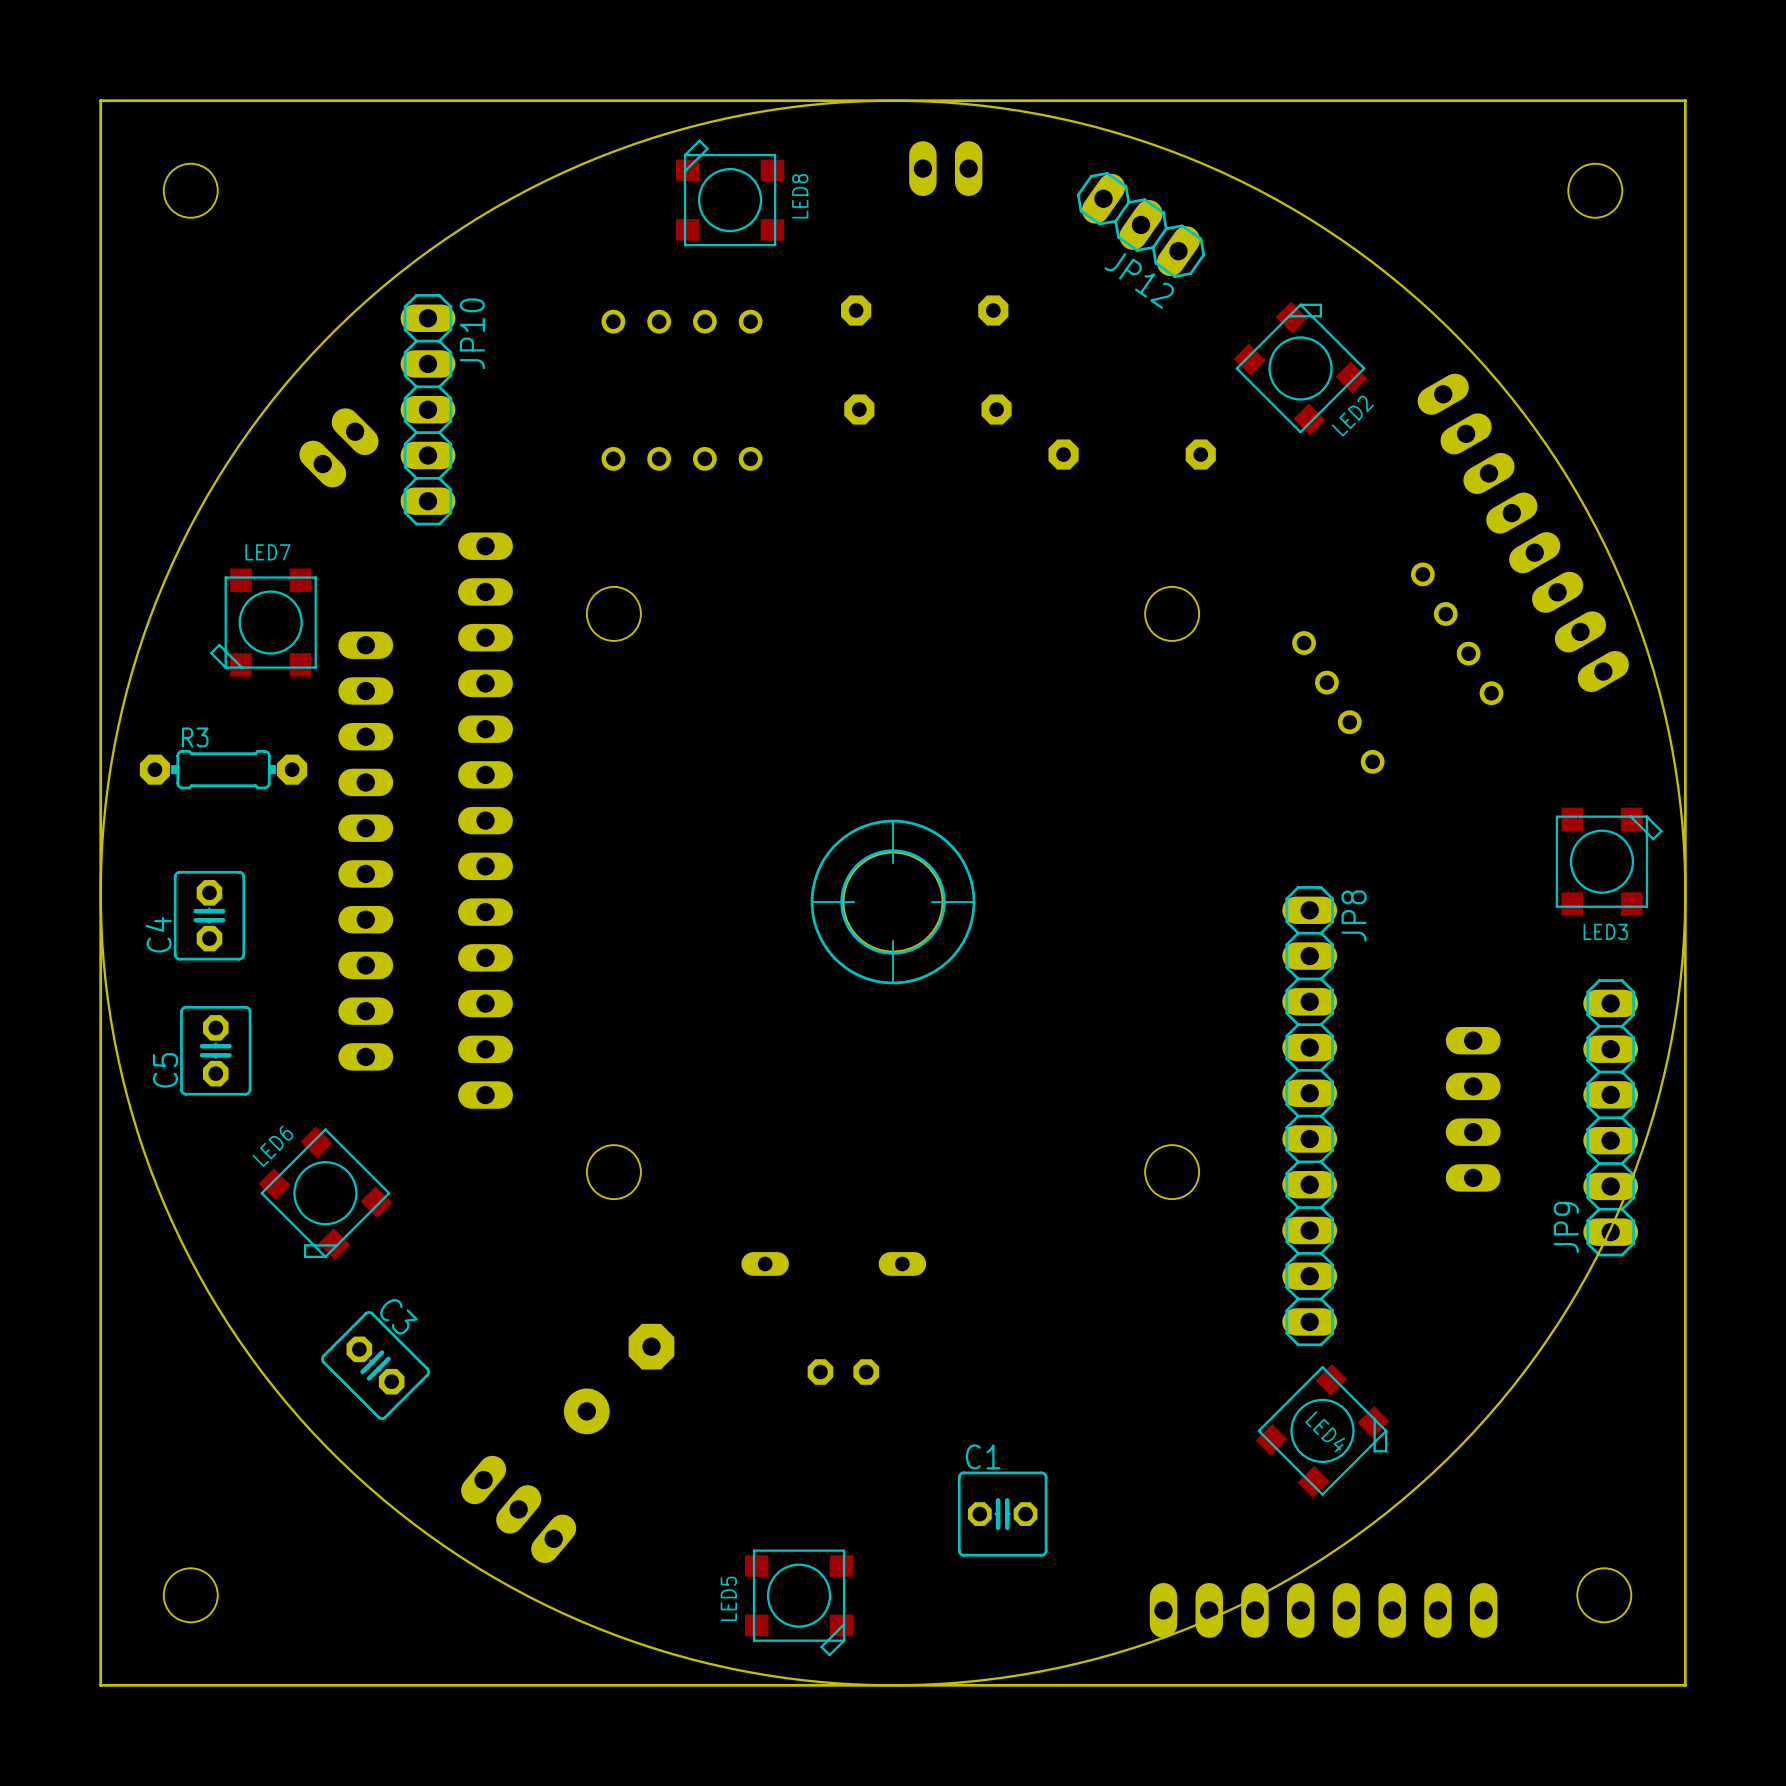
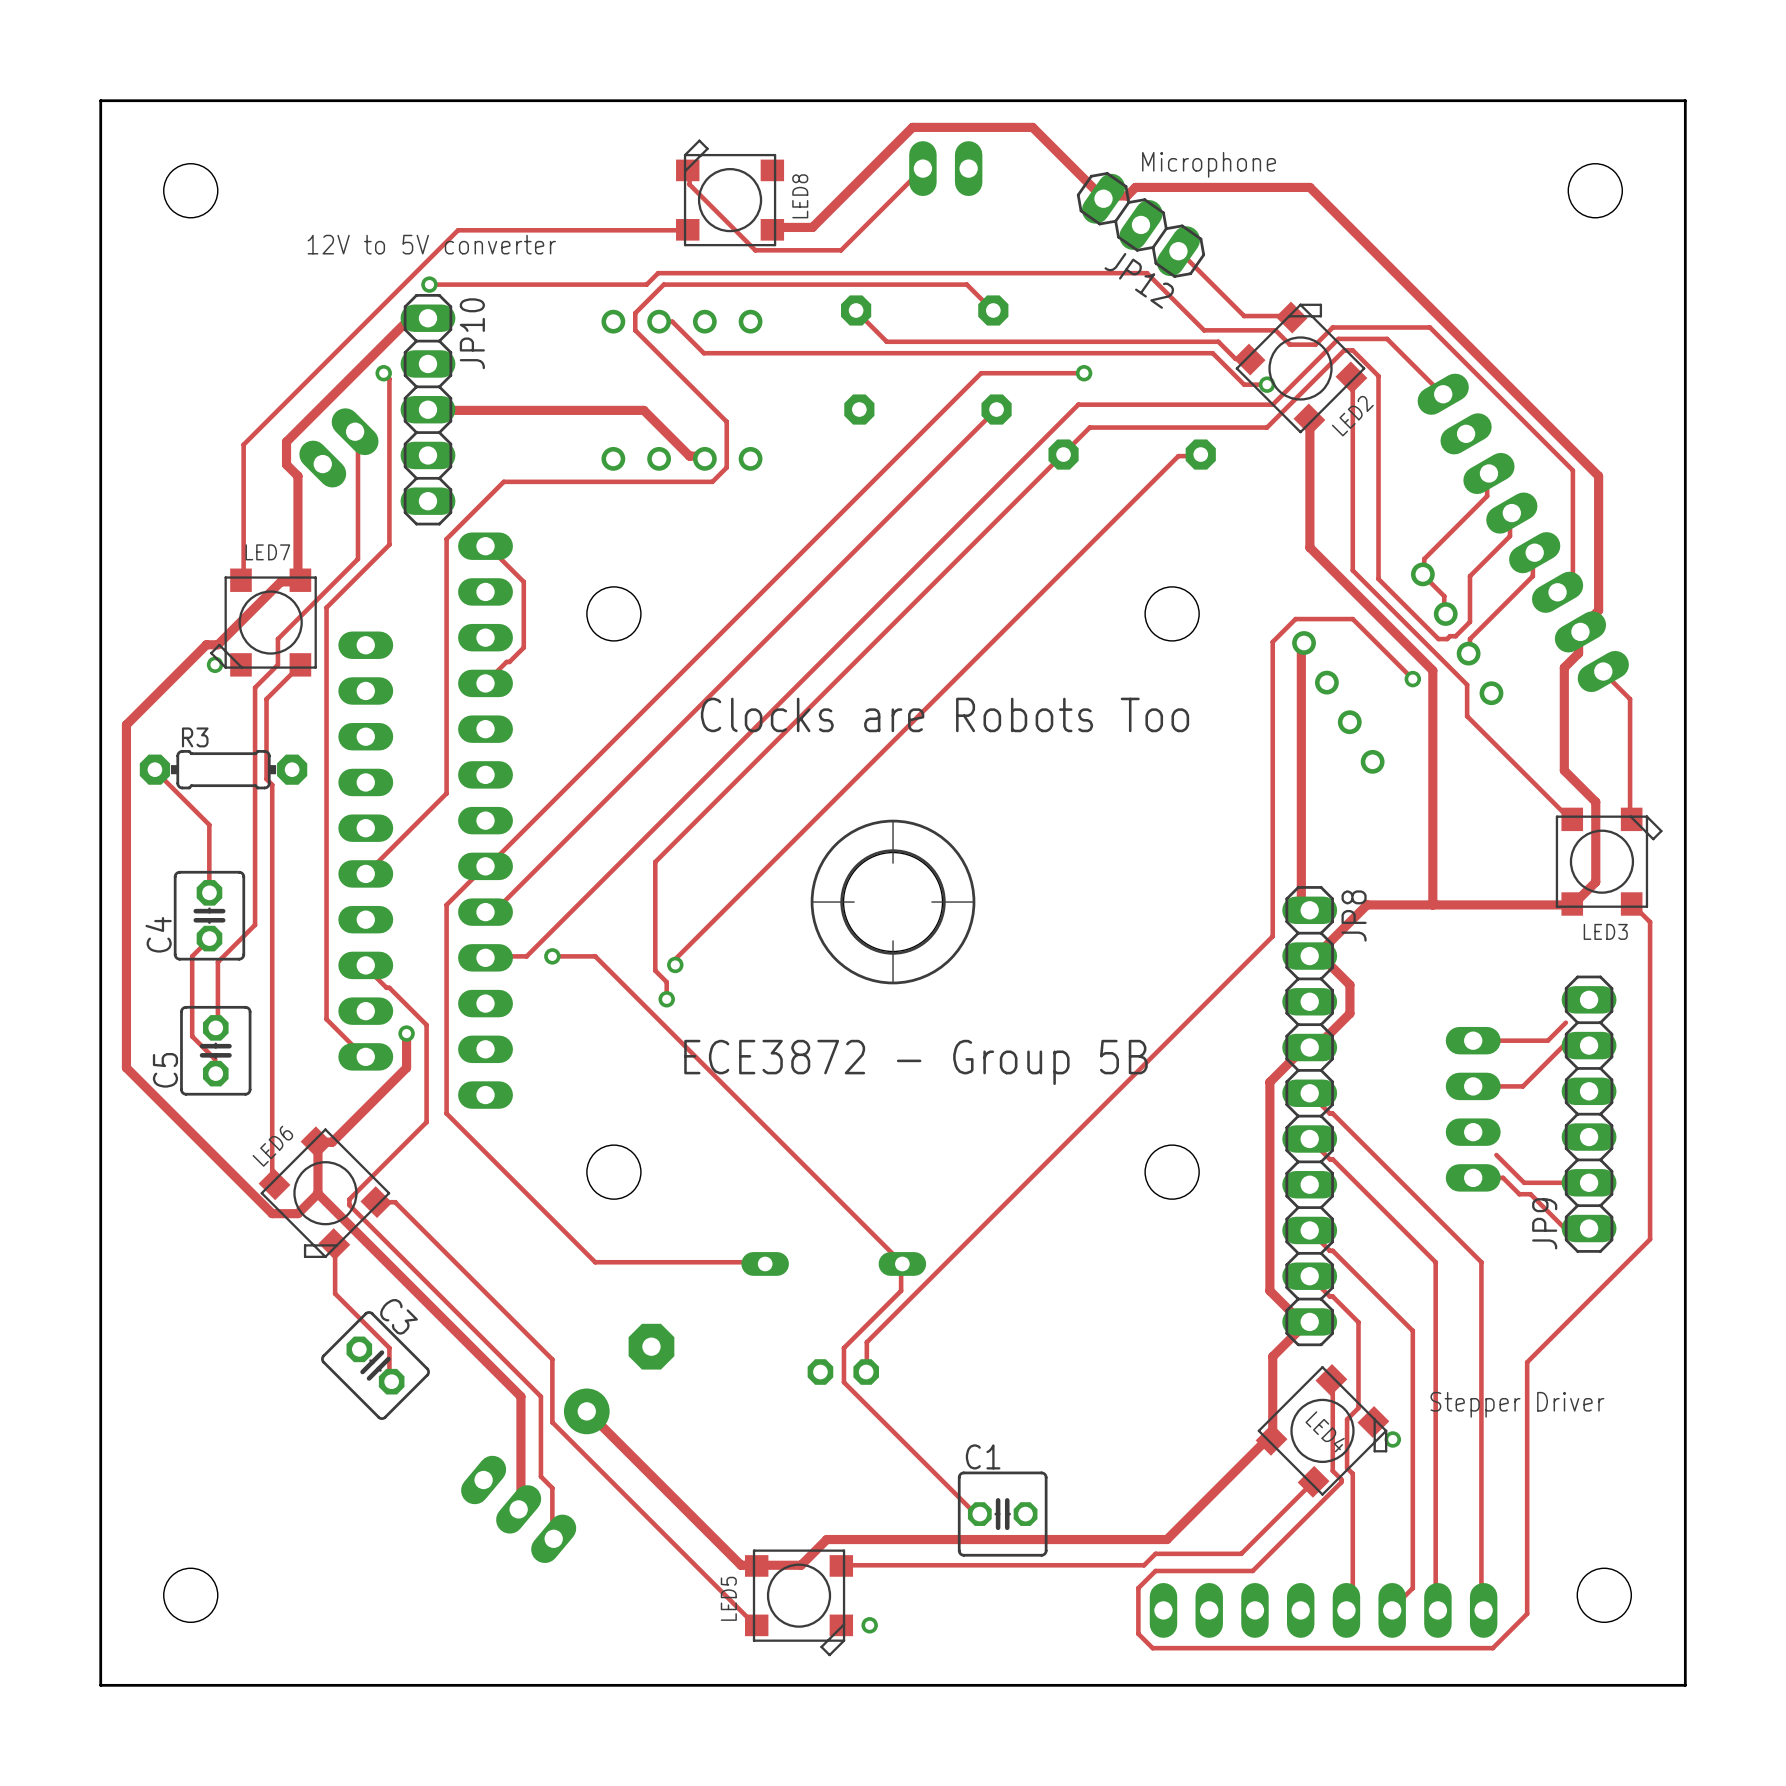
round board edge: [99, 99, 1687, 1687] -> none
text: none -> Microphone (1209, 164)
track: none -> (922, 168) (841, 250) (755, 250) (689, 184) (687, 170)
track: none -> (687, 229) (458, 230) (243, 444) (243, 579) (240, 580)
track: none -> (772, 229) (772, 227) (812, 227) (912, 127) (1032, 127) (1103, 198) (1106, 195) (1126, 195) (1135, 187) (1309, 187) (1598, 476) (1598, 610) (1581, 627) (1578, 633) (1578, 653) (1564, 667) (1564, 770) (1595, 802) (1595, 882) (1575, 902) (1570, 904) (1367, 904) (1318, 953) (1309, 953) (1309, 956) (1321, 956) (1349, 984) (1349, 1013) (1318, 1045) (1309, 1045) (1309, 1047) (1307, 1045) (1269, 1082) (1269, 1290) (1301, 1322) (1309, 1321) (1307, 1322) (1272, 1356) (1272, 1439) (1267, 1439) (1166, 1539) (826, 1539) (801, 1565) (741, 1565) (586, 1411)
text: none -> 12V to 5V converter (431, 244)
track: none -> (1178, 251) (1244, 316) (1291, 317)
track: none -> (429, 284) (646, 284) (658, 273) (1146, 273) (1204, 330) (1275, 330) (1289, 344) (1315, 344) (1332, 327) (1429, 327) (1572, 470) (1572, 576) (1557, 592)
via: none -> (429, 284)
track: none -> (856, 310) (886, 341) (1218, 341) (1235, 358) (1249, 359)
track: none -> (993, 310) (966, 284) (663, 284) (635, 313) (635, 330) (726, 421) (726, 467) (712, 481) (503, 481) (446, 539) (446, 793) (365, 873)
track: none -> (427, 318) (409, 318) (286, 441) (286, 464) (297, 476) (297, 579) (300, 580) (280, 581) (217, 644) (206, 644) (126, 724) (126, 1067) (272, 1213) (297, 1213) (317, 1193)
track: none -> (659, 321) (672, 321) (703, 353) (1212, 353) (1244, 384) (1267, 384)
track: none -> (383, 373) (389, 378) (389, 544) (326, 607) (326, 1019) (365, 1056)
via: none -> (383, 373)
track: none -> (1084, 373) (981, 373) (486, 867) (483, 867) (446, 904) (446, 1113) (595, 1262) (763, 1262) (765, 1263)
via: none -> (1084, 373)
track: none -> (1351, 377) (1352, 570) (1467, 684) (1467, 716) (1572, 819)
via: none -> (1267, 384)
track: none -> (1443, 394) (1387, 338) (1338, 338) (1272, 404) (1078, 404) (526, 956) (485, 957)
track: none -> (427, 409) (643, 410) (689, 456) (703, 456) (704, 458)
track: none -> (996, 409) (495, 910) (485, 912)
track: none -> (1309, 419) (1309, 547) (1432, 670) (1432, 904)
track: none -> (355, 431) (357, 436) (357, 559) (277, 639) (277, 664) (255, 687) (255, 924) (217, 962) (217, 1027) (215, 1027)
track: none -> (1200, 454) (1178, 456) (675, 959) (675, 964)
track: none -> (1488, 473) (1487, 476) (1487, 496) (1424, 559) (1422, 574) (1444, 596) (1445, 614)
track: none -> (1511, 513) (1510, 513) (1510, 536) (1469, 576) (1469, 621) (1455, 636) (1438, 639) (1378, 579) (1378, 376) (1352, 350) (1344, 350) (1267, 427) (1089, 427) (655, 862) (655, 970) (666, 982) (666, 999)
track: none -> (485, 546) (486, 544) (523, 581) (523, 647) (485, 683)
track: none -> (1534, 552) (1532, 553) (1532, 576) (1469, 639) (1468, 653)
track: none -> (1304, 643) (1301, 644) (1301, 902) (1309, 910)
via: none -> (215, 664)
track: none -> (300, 664) (266, 699) (266, 779) (272, 784) (272, 1182) (274, 1184)
track: none -> (1603, 671) (1630, 699) (1630, 819) (1631, 819)
track: none -> (1412, 679) (1352, 619) (1295, 619) (1272, 641) (1272, 936) (866, 1342) (866, 1372)
via: none -> (1412, 679)
text: none -> Clocks are Robots Too (944, 714)
track: none -> (154, 769) (209, 824) (209, 892)
track: none -> (1631, 904) (1650, 922) (1650, 1239) (1527, 1362) (1527, 1613) (1492, 1648) (1152, 1648) (1138, 1633) (1138, 1588) (1155, 1570) (1252, 1570) (1341, 1482) (1341, 1479) (1332, 1470) (1331, 1379)
track: none -> (209, 938) (192, 956) (192, 1036) (215, 1059) (215, 1073)
track: none -> (552, 956) (595, 956) (901, 1262) (901, 1290) (843, 1348) (843, 1382) (978, 1516) (979, 1514)
via: none -> (552, 956)
via: none -> (675, 964)
track: none -> (365, 965) (426, 1024) (426, 1122) (349, 1199) (349, 1205) (540, 1396) (540, 1476) (552, 1488) (553, 1538)
via: none -> (666, 999)
track: none -> (1565, 1022) (1547, 1040) (1473, 1040)
track: none -> (406, 1033) (406, 1067) (332, 1142) (316, 1142) (317, 1193)
via: none -> (406, 1033)
track: none -> (1564, 1045) (1522, 1086) (1473, 1086)
text: none -> ECE3872 - Group 5B (916, 1062)
track: none -> (1309, 1093) (1329, 1113) (1332, 1113) (1481, 1262) (1481, 1608) (1483, 1610)
JP9 position: (1610, 1117) -> (1589, 1114)
track: none -> (1309, 1138) (1329, 1159) (1332, 1159) (1435, 1262) (1435, 1608) (1437, 1610)
track: none -> (1496, 1155) (1524, 1182) (1589, 1182)
track: none -> (1473, 1177) (1503, 1177) (1519, 1194) (1530, 1194) (1564, 1227)
track: none -> (317, 1193) (520, 1396) (520, 1508) (518, 1509)
track: none -> (376, 1202) (395, 1202) (552, 1359) (552, 1422) (756, 1625)
track: none -> (1309, 1230) (1329, 1250) (1332, 1250) (1412, 1330) (1412, 1588) (1392, 1610)
track: none -> (334, 1244) (335, 1293) (389, 1348) (389, 1379) (391, 1381)
track: none -> (1309, 1276) (1358, 1322) (1358, 1408) (1347, 1419) (1347, 1468) (1352, 1473) (1352, 1602) (1346, 1610)
text: none -> Stepper Driver (1517, 1404)
via: none -> (1392, 1439)
track: none -> (1313, 1481) (1241, 1553) (1155, 1553) (1144, 1565) (841, 1565)
via: none -> (869, 1625)

